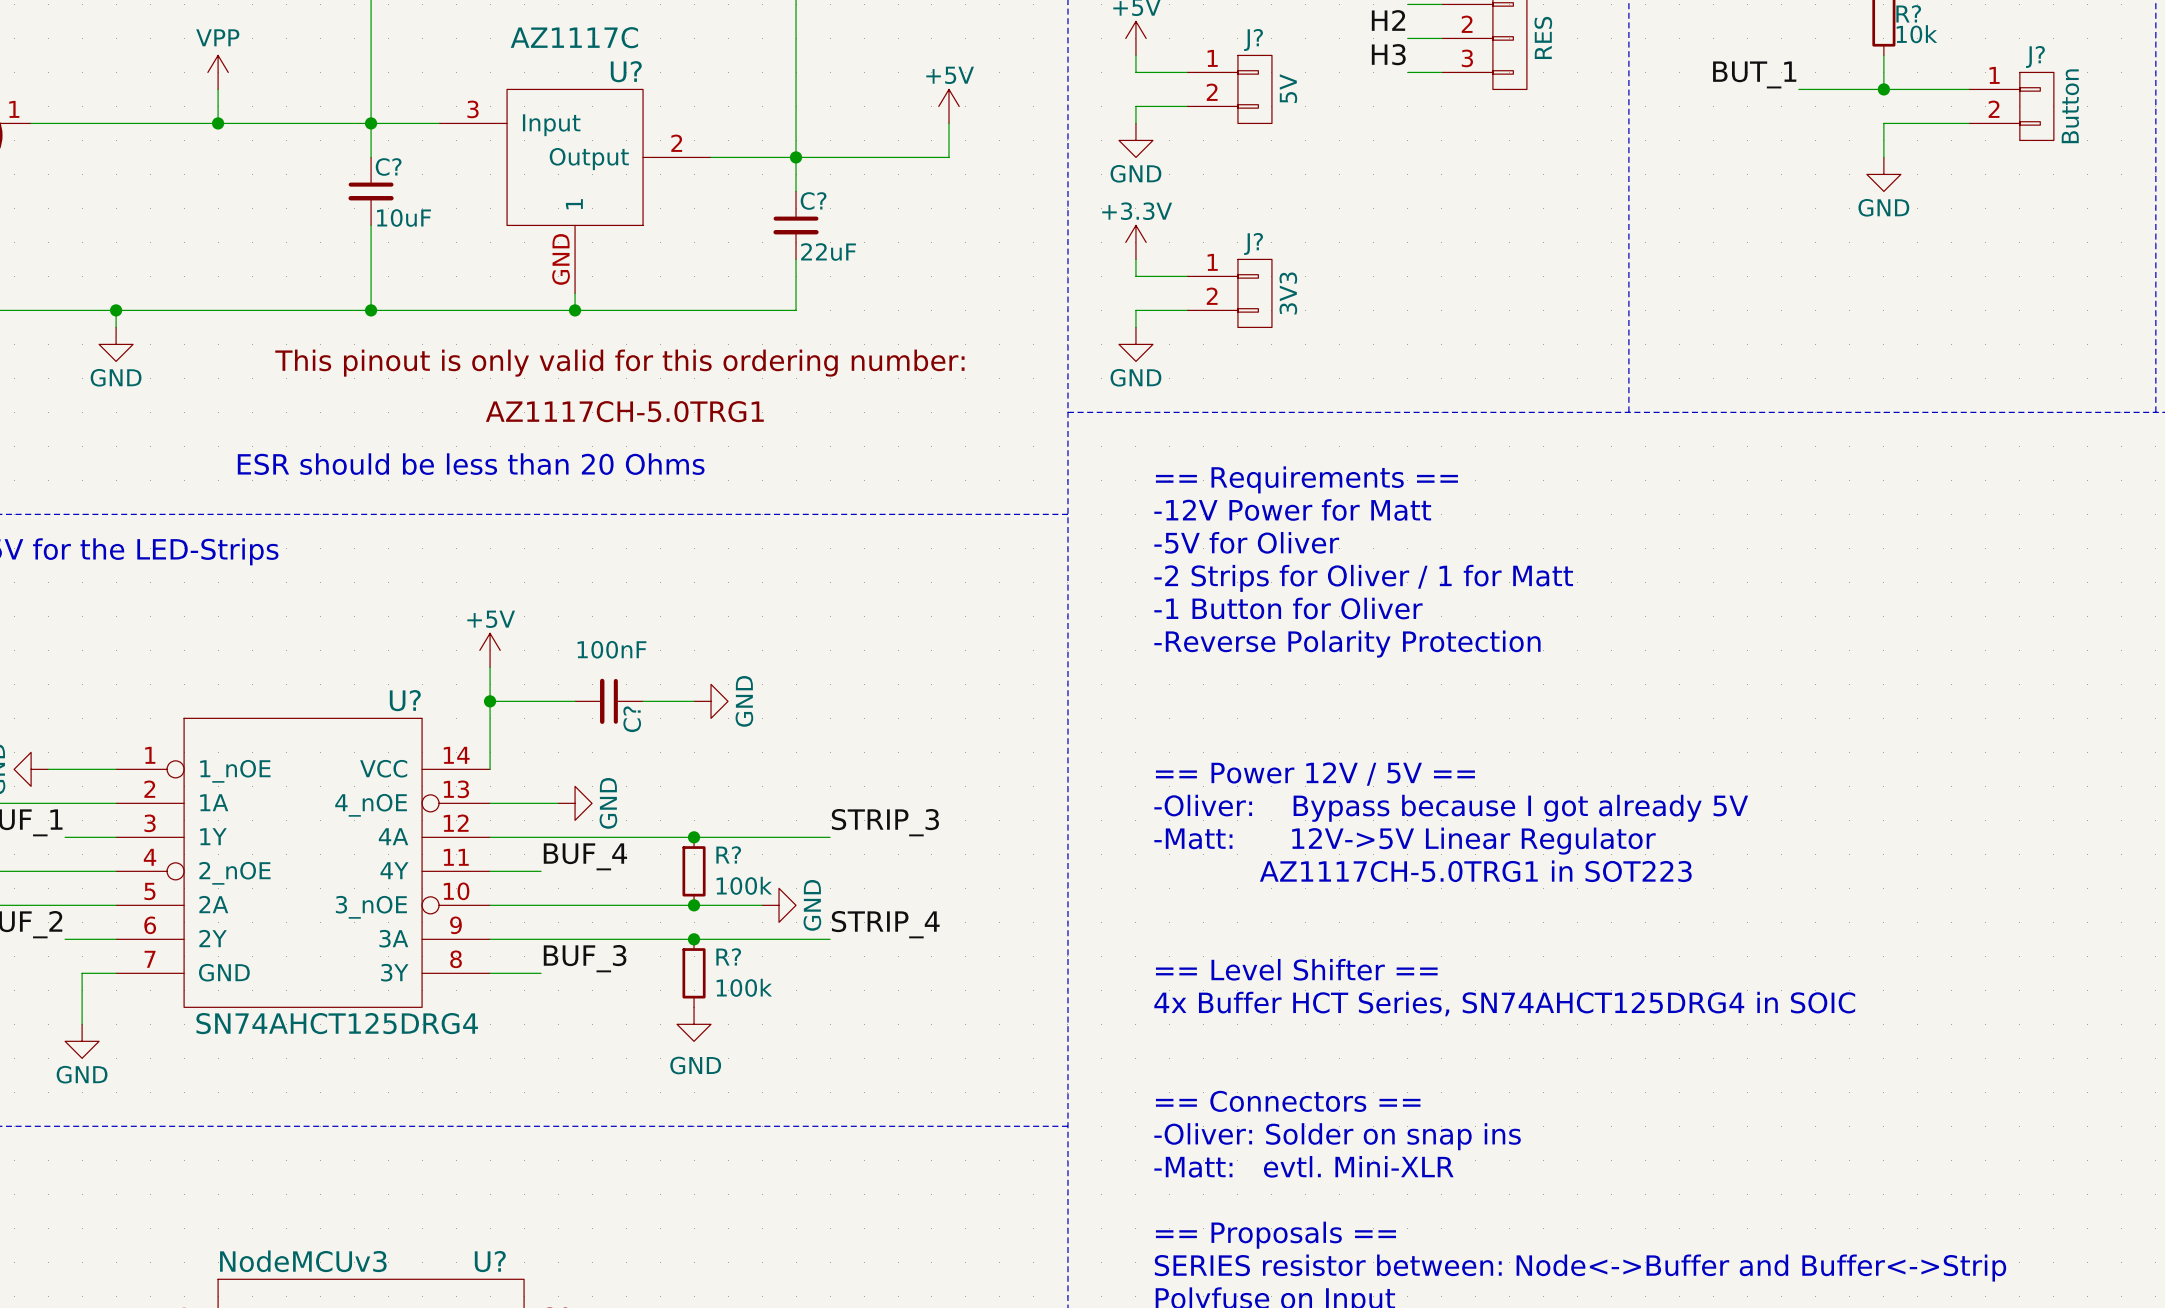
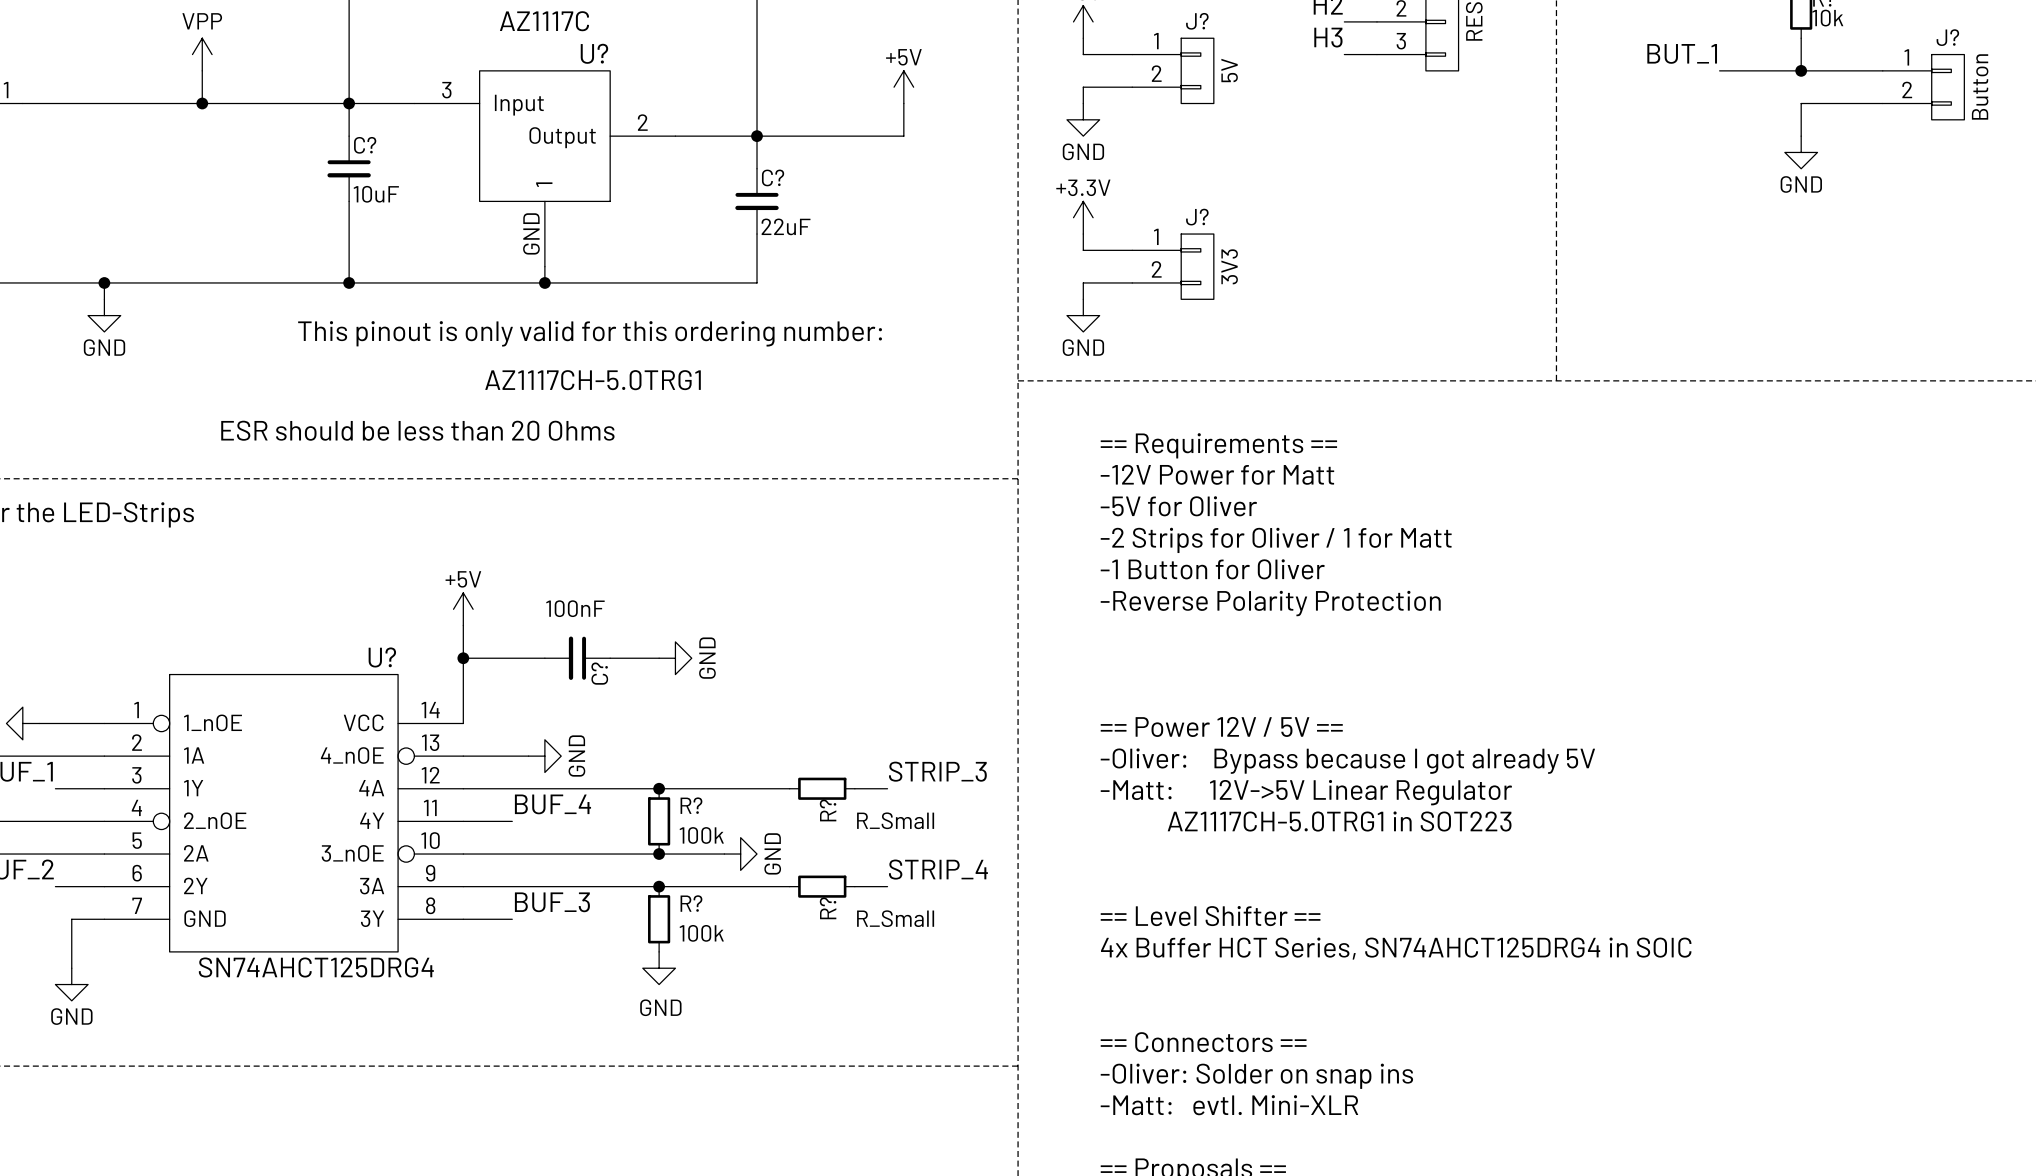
label position: STRIP_3 (885, 822) -> STRIP_3 (937, 771)
R?: none -> R_Small (822, 788)
wire: none -> (854, 788) (887, 788)
label position: STRIP_4 (885, 924) -> STRIP_4 (938, 869)
R?: none -> R_Small (822, 886)
wire: none -> (854, 886) (887, 886)

